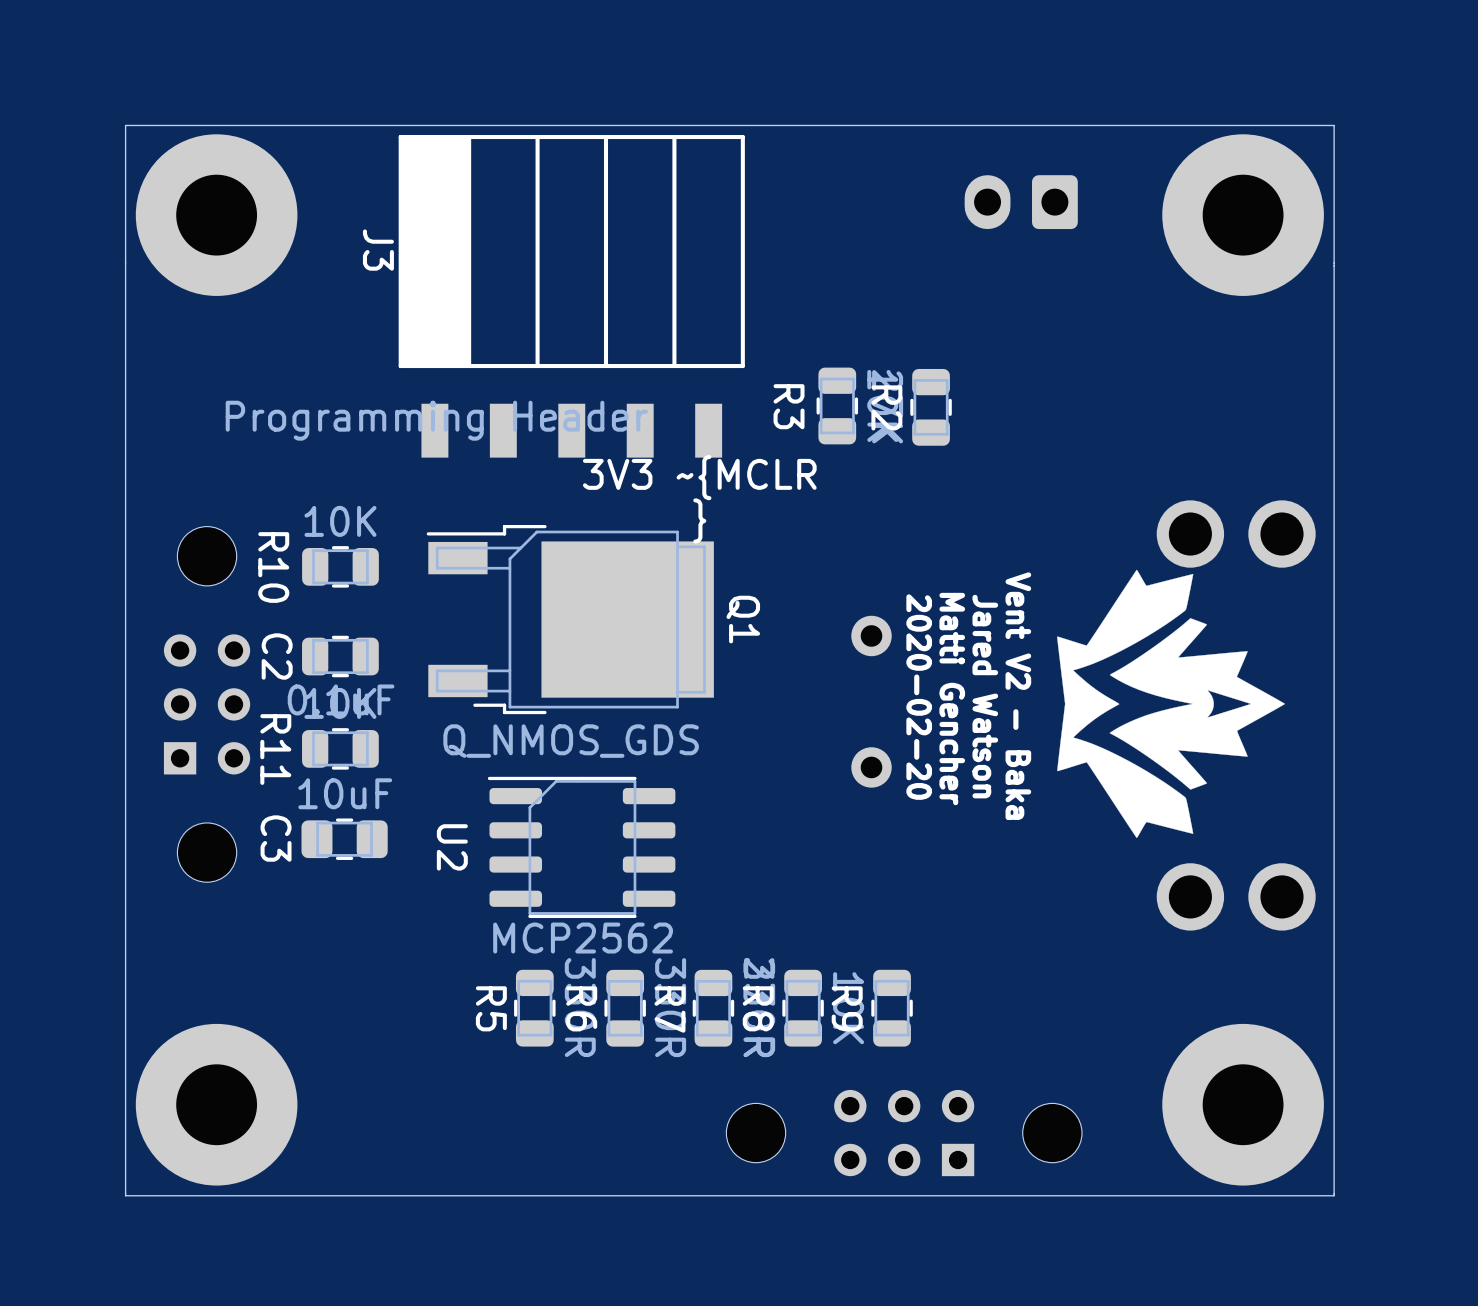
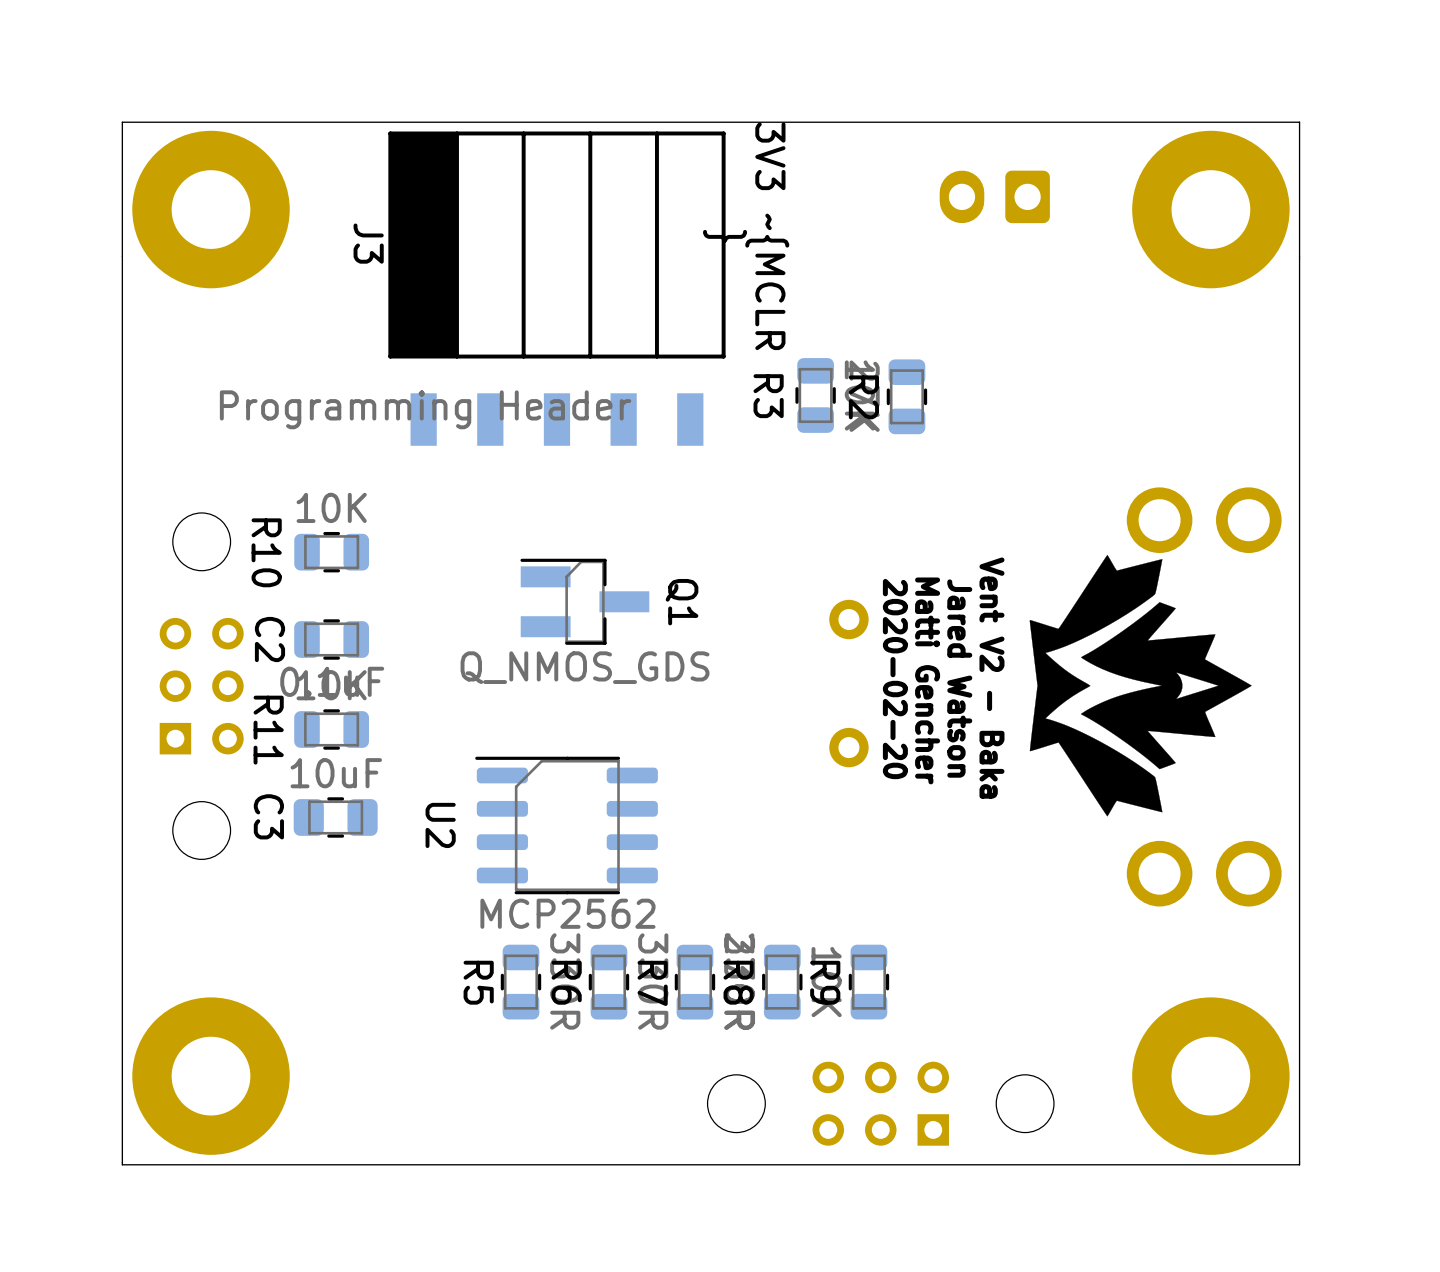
text rotation: 0° (699, 477) -> 90° clockwise (767, 236)
text rotation: 0° (699, 520) -> 90° clockwise (725, 236)
text position: } (699, 520) -> } (725, 236)
Q1 footprint: [426, 524, 714, 715] -> [520, 558, 650, 645]
Q1 name position: Q1 (743, 619) -> Q1 (682, 602)
Q1 value position: Q_NMOS_GDS (571, 741) -> Q_NMOS_GDS (585, 667)

